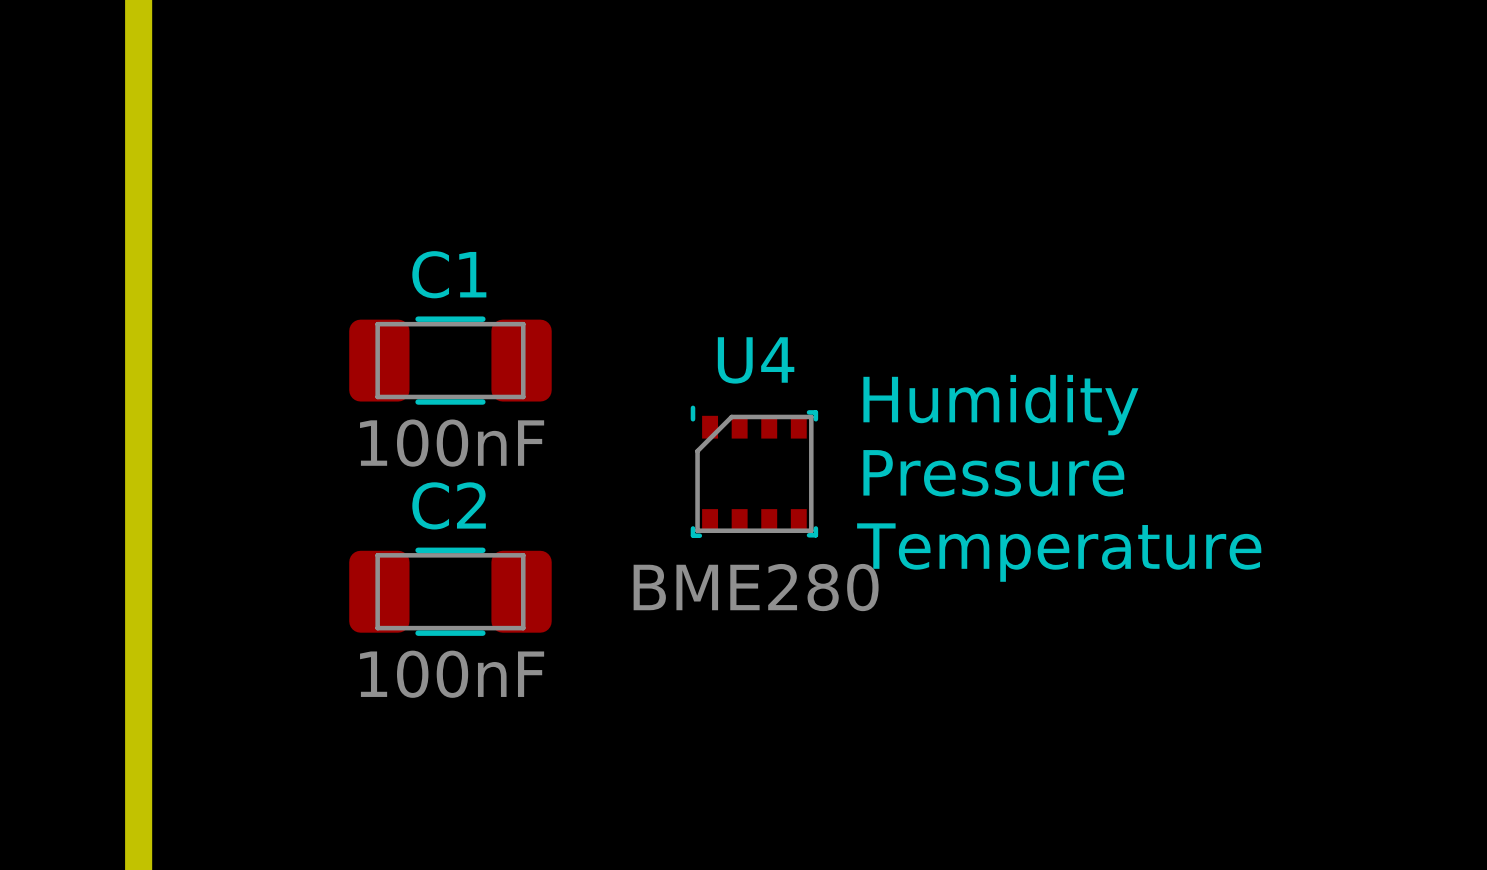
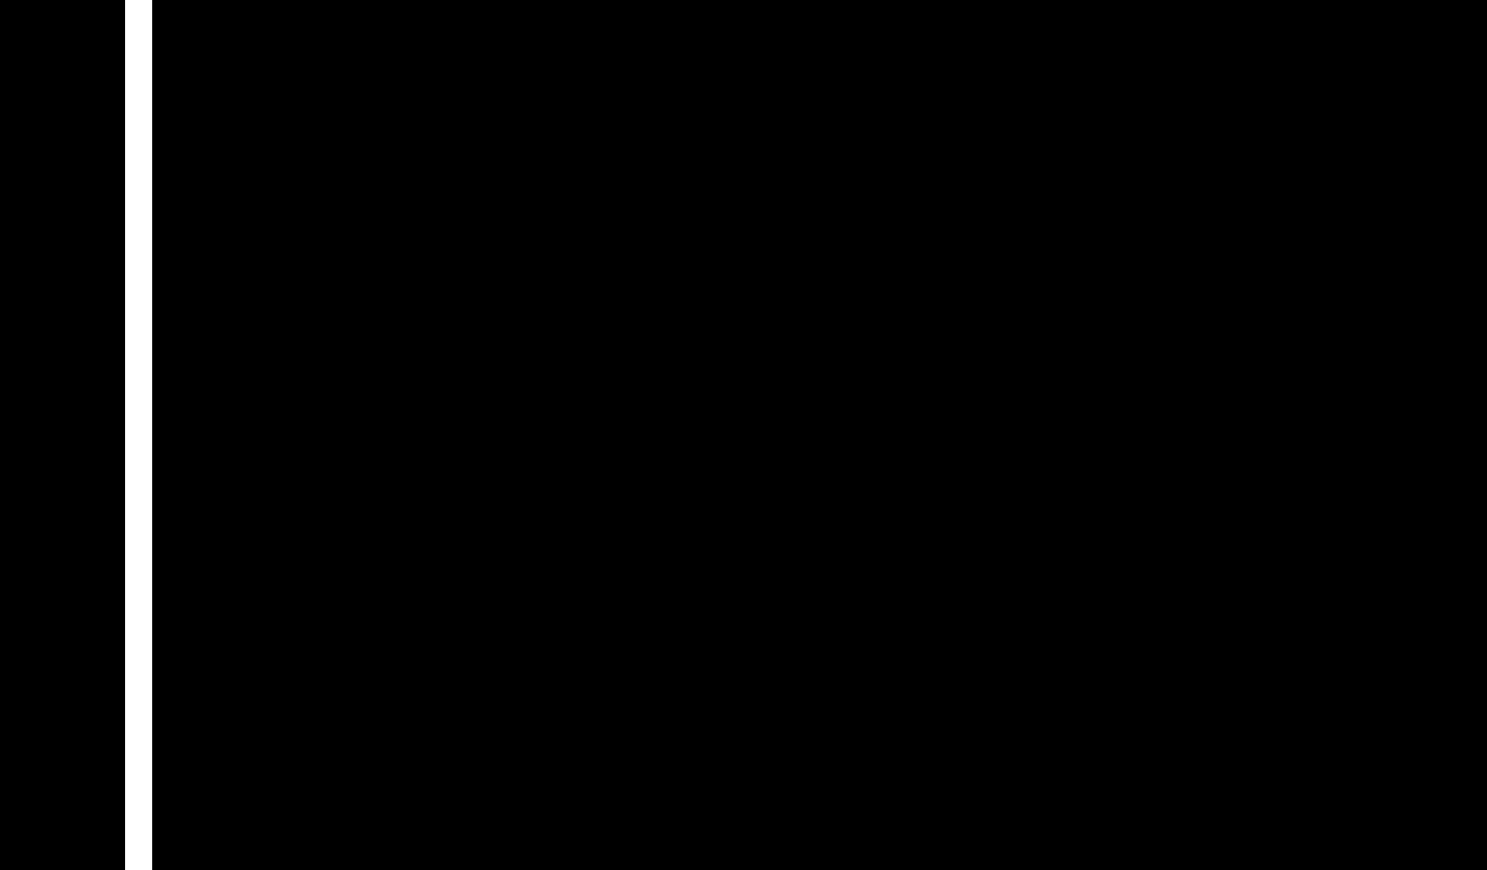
C1: 100nF (450, 360) -> none
text: Humidity (1000, 405) -> none
U4: BME280 (754, 471) -> none
text: Pressure (993, 473) -> none
text: Temperature (1059, 552) -> none
C2: 100nF (450, 591) -> none

